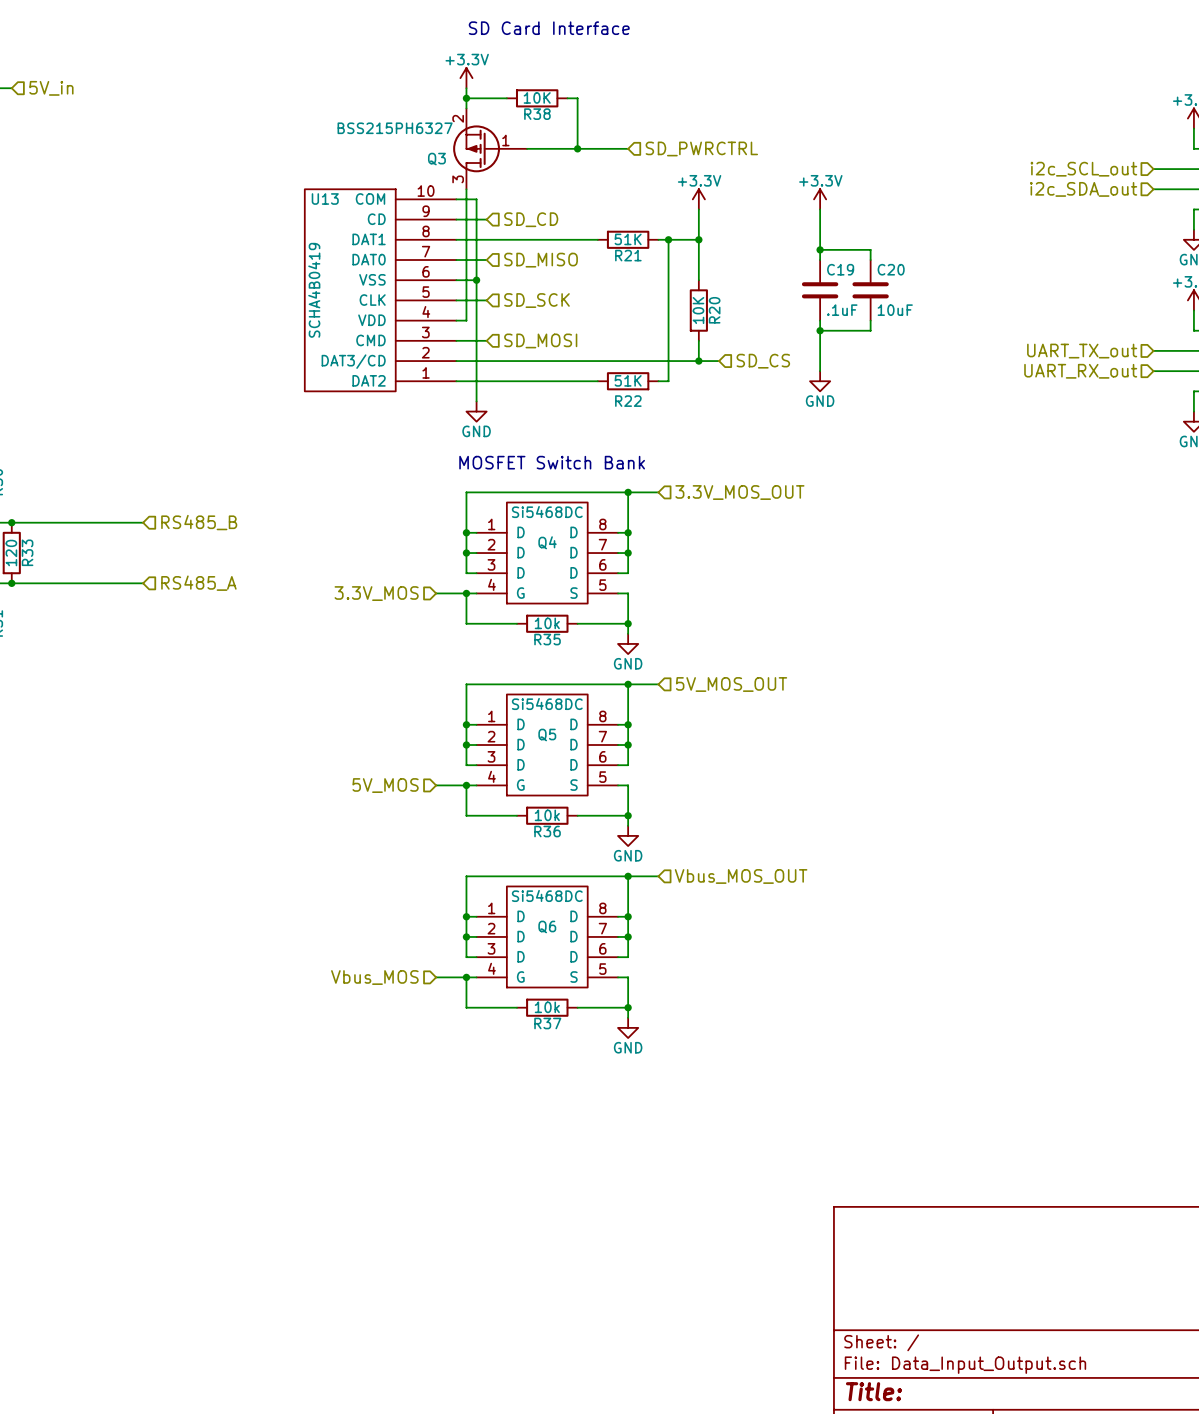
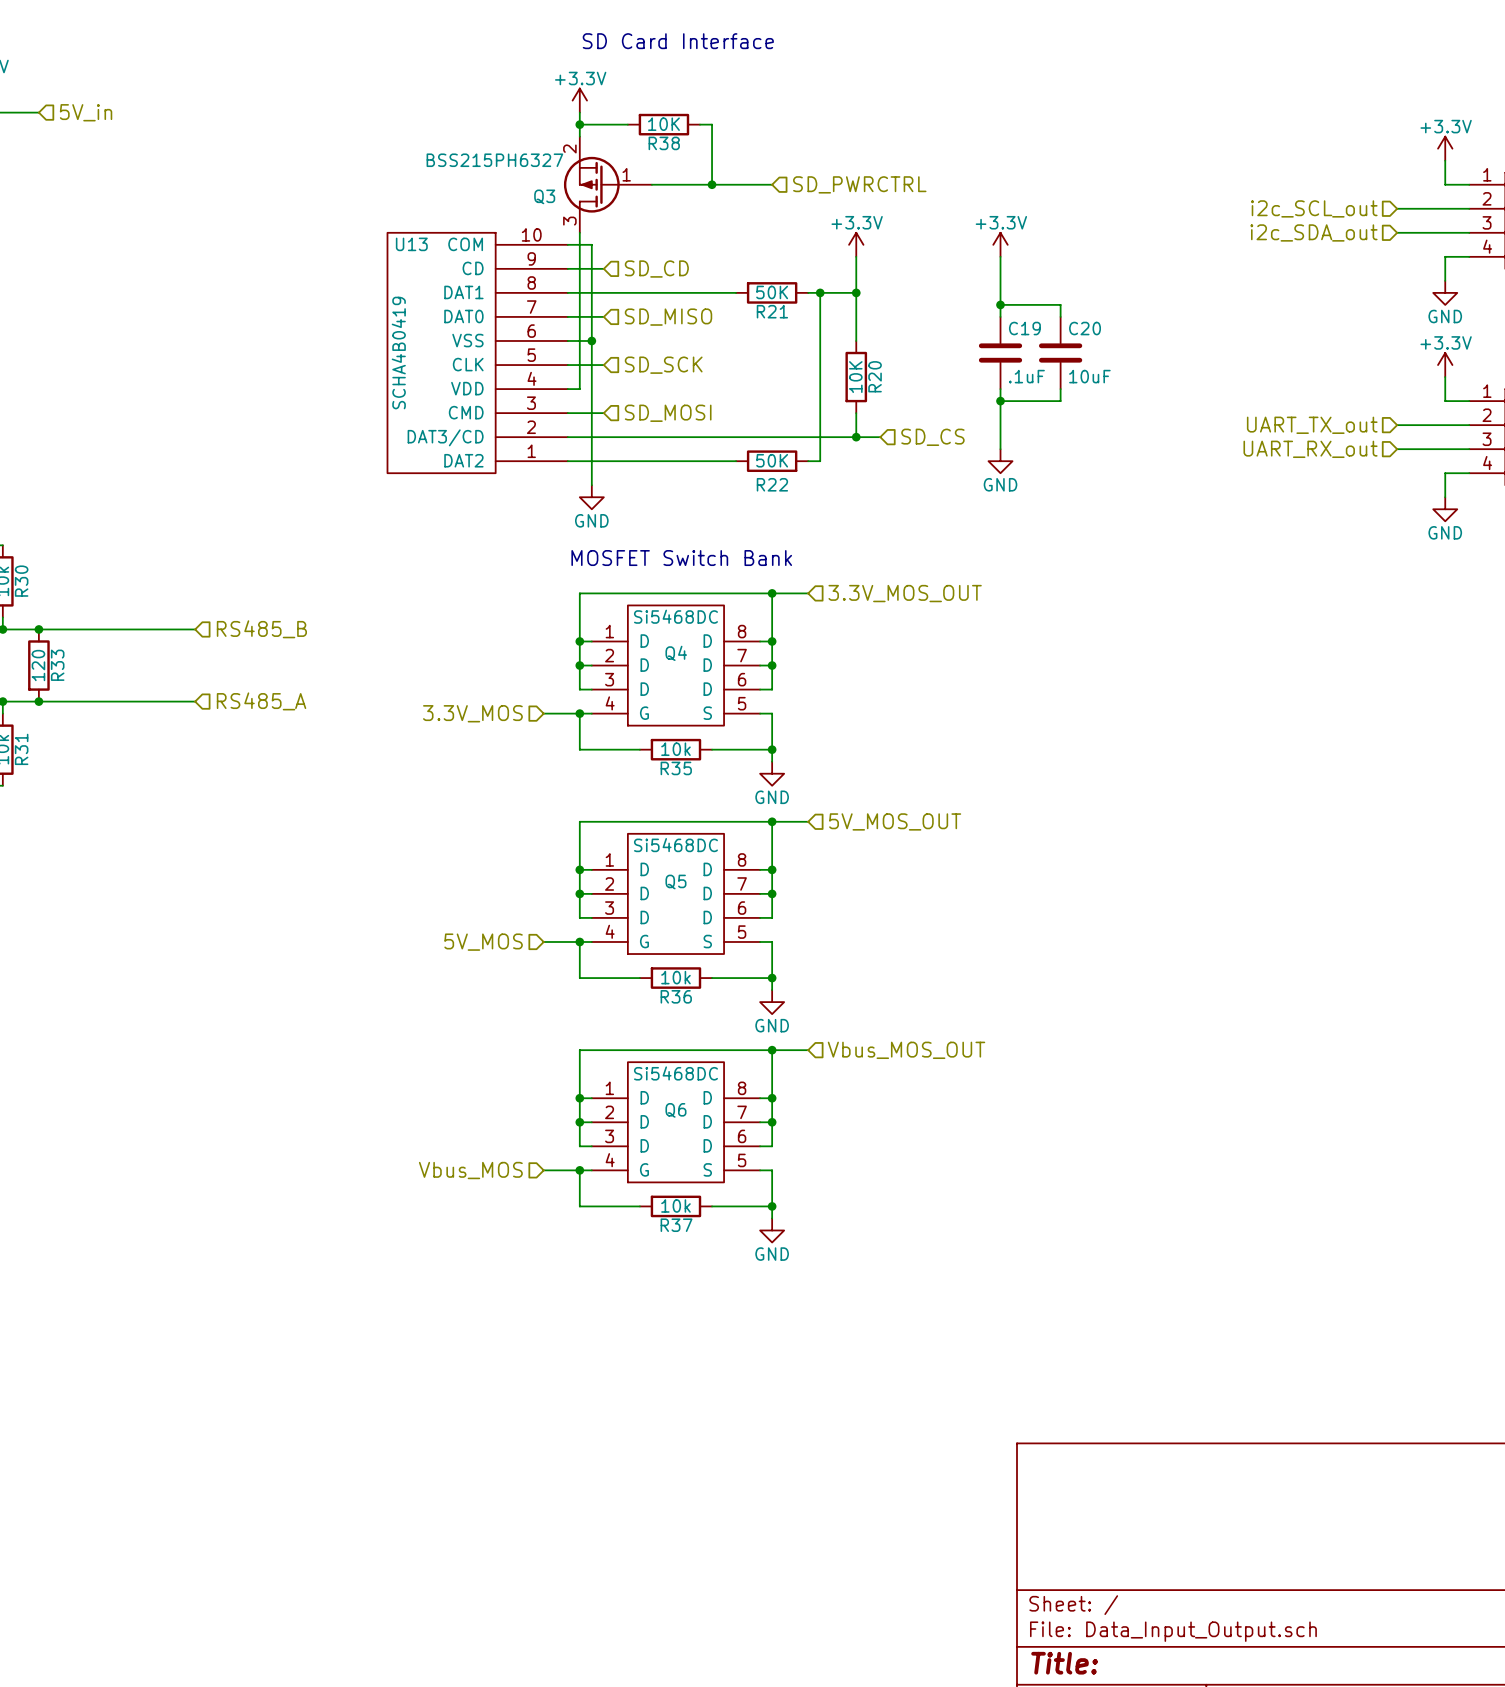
R21 value: 51K (628, 239) -> 50K (772, 292)
R22 value: 51K (628, 380) -> 50K (772, 460)

